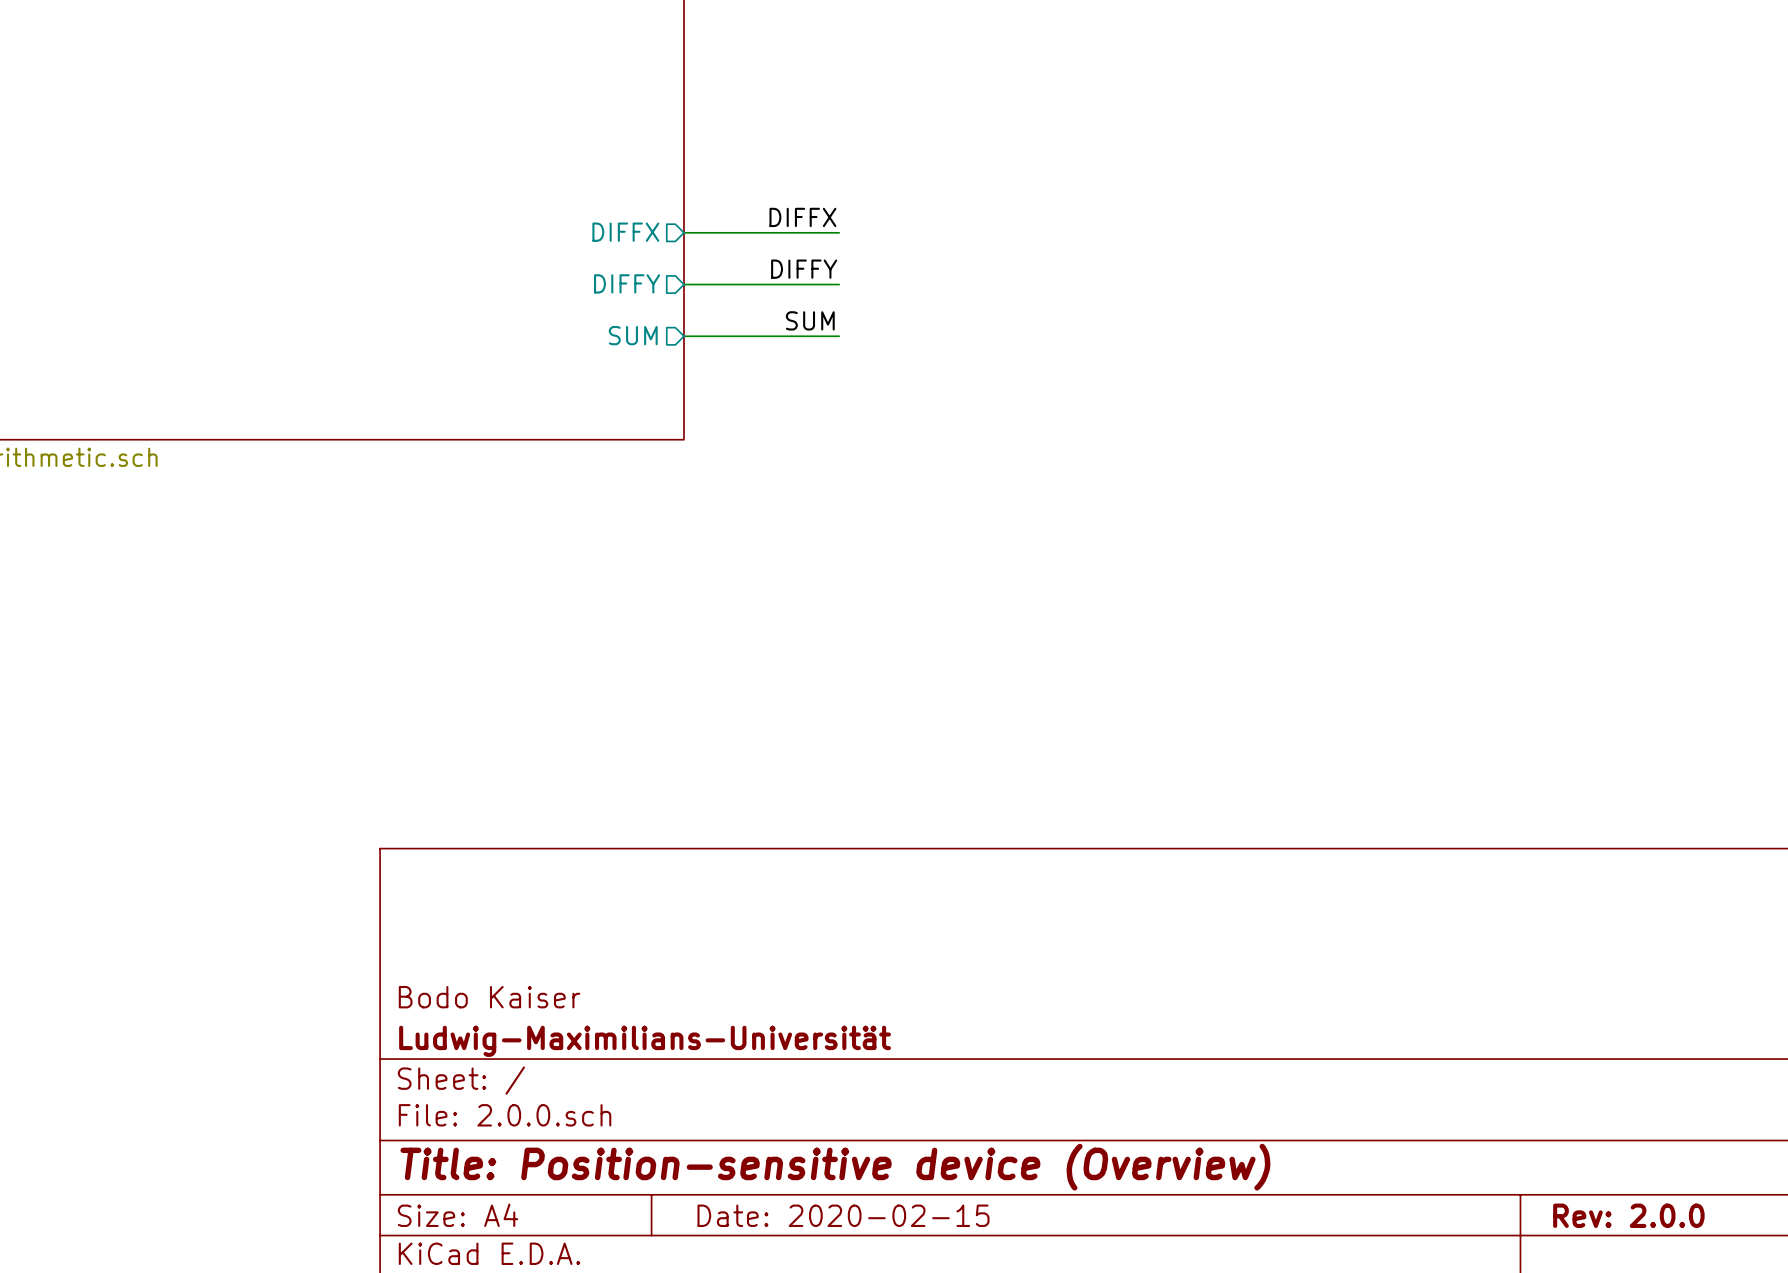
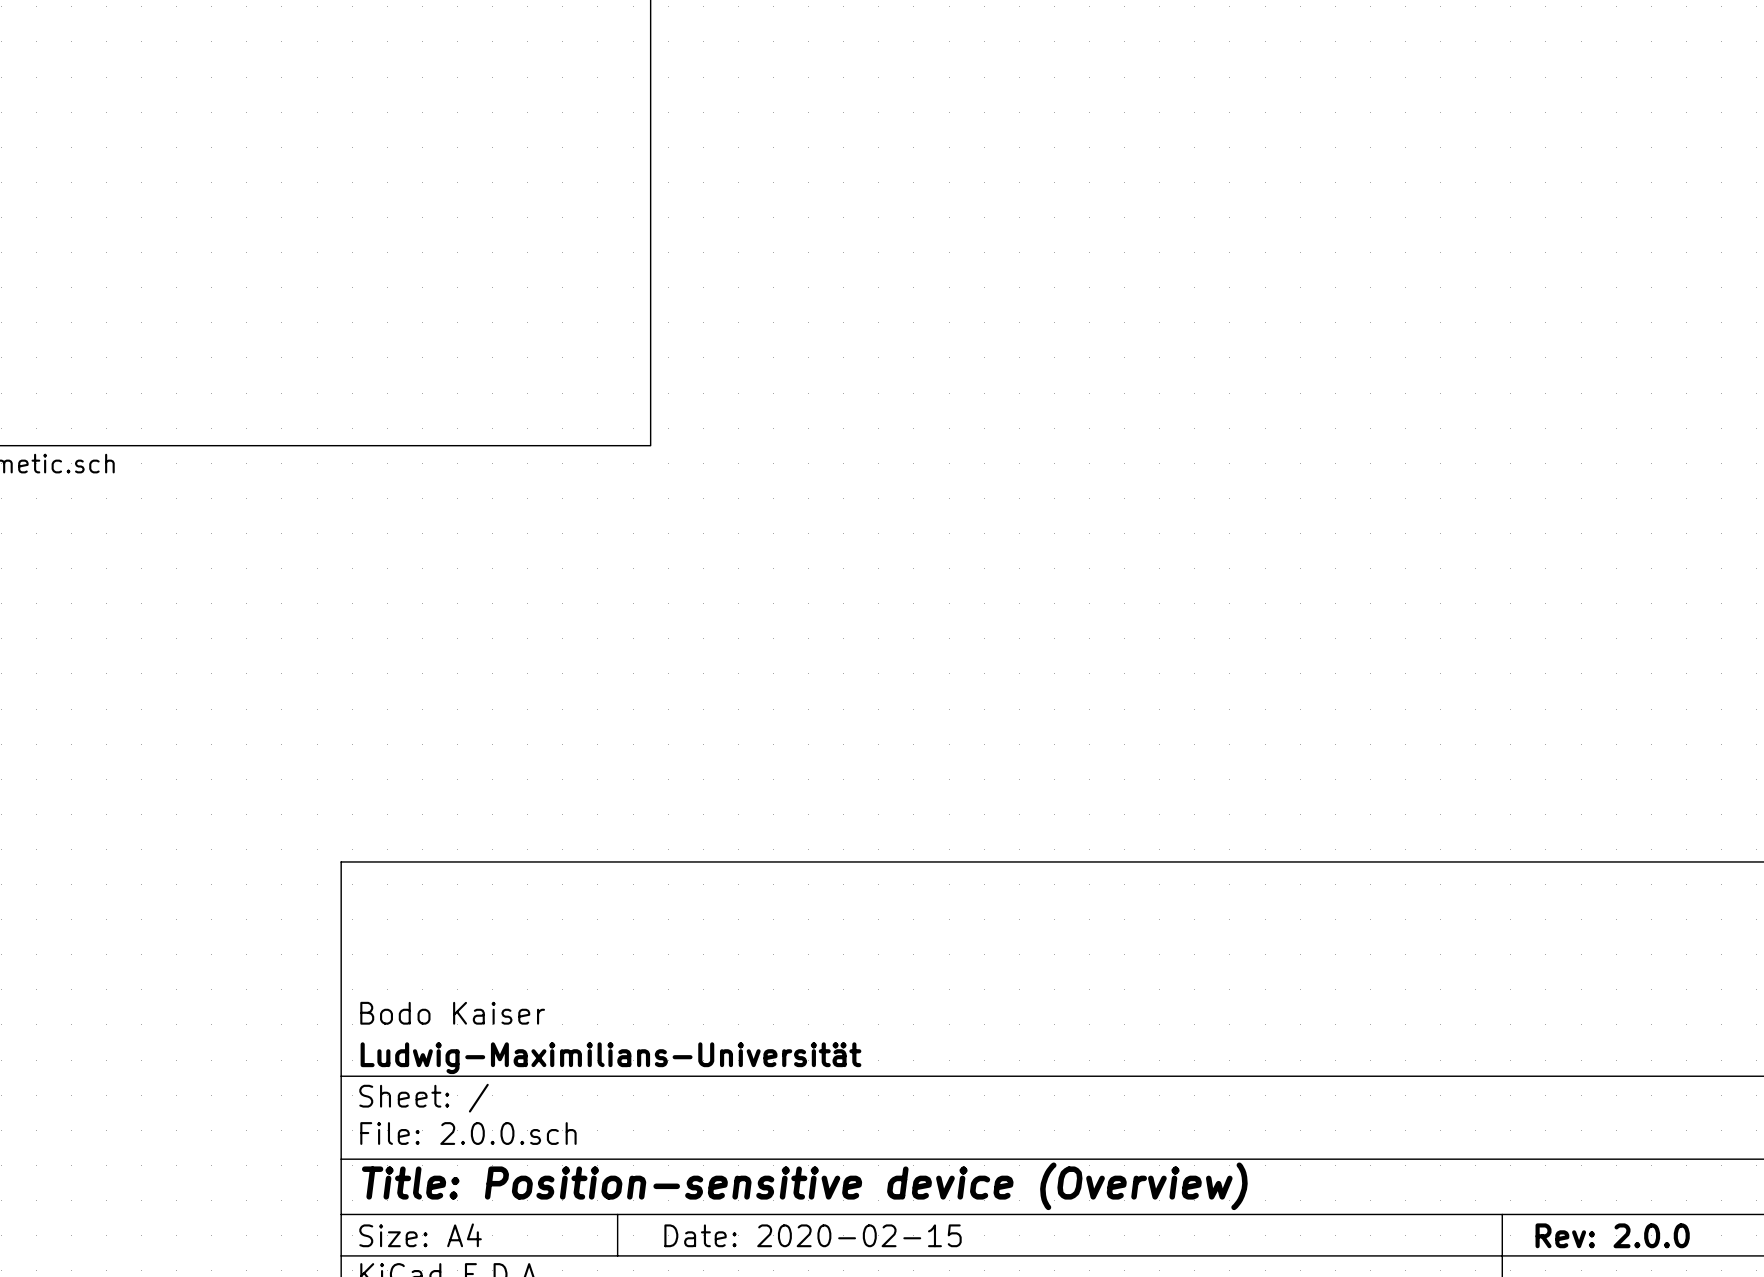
label: DIFFX (802, 217) -> none
sheet pin: DIFFX (625, 232) -> none
wire: (684, 232) (839, 232) -> none
label: DIFFY (804, 269) -> none
sheet pin: DIFFY (627, 283) -> none
wire: (684, 284) (839, 284) -> none
label: SUM (810, 320) -> none
sheet pin: SUM (633, 335) -> none
wire: (684, 336) (839, 336) -> none

